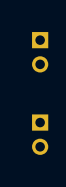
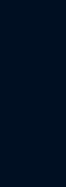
part: (40, 52) -> none
part: (40, 134) -> none

